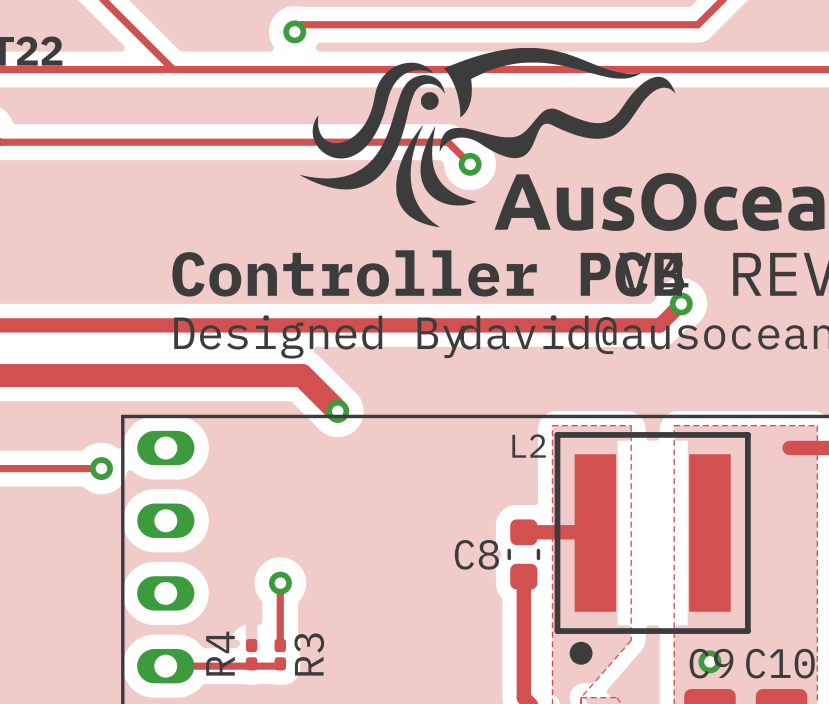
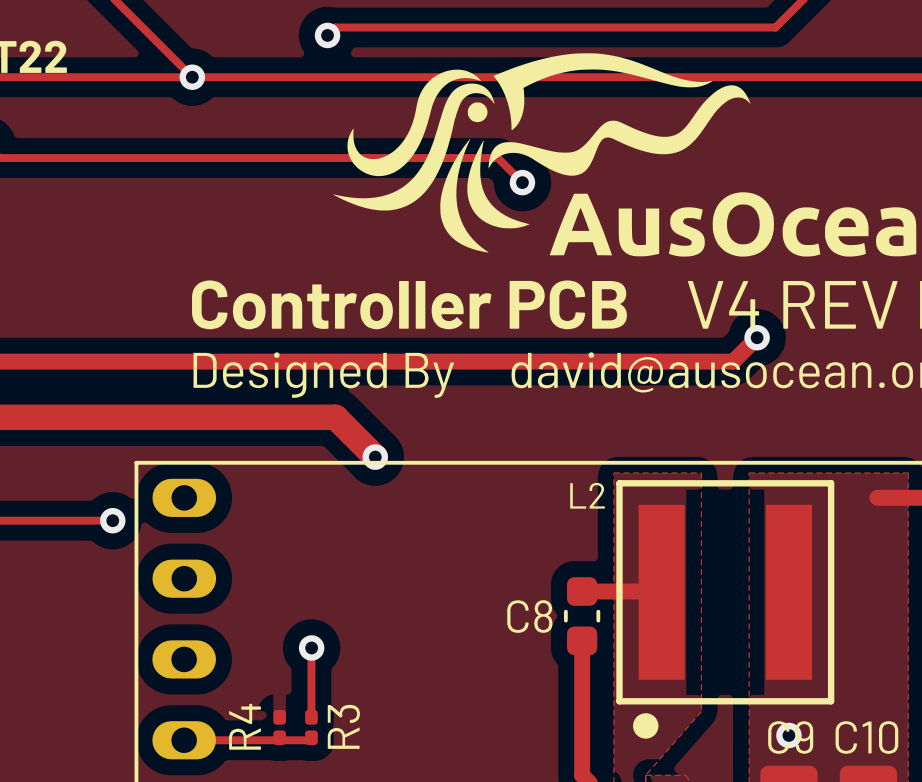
via: none -> (192, 77)

